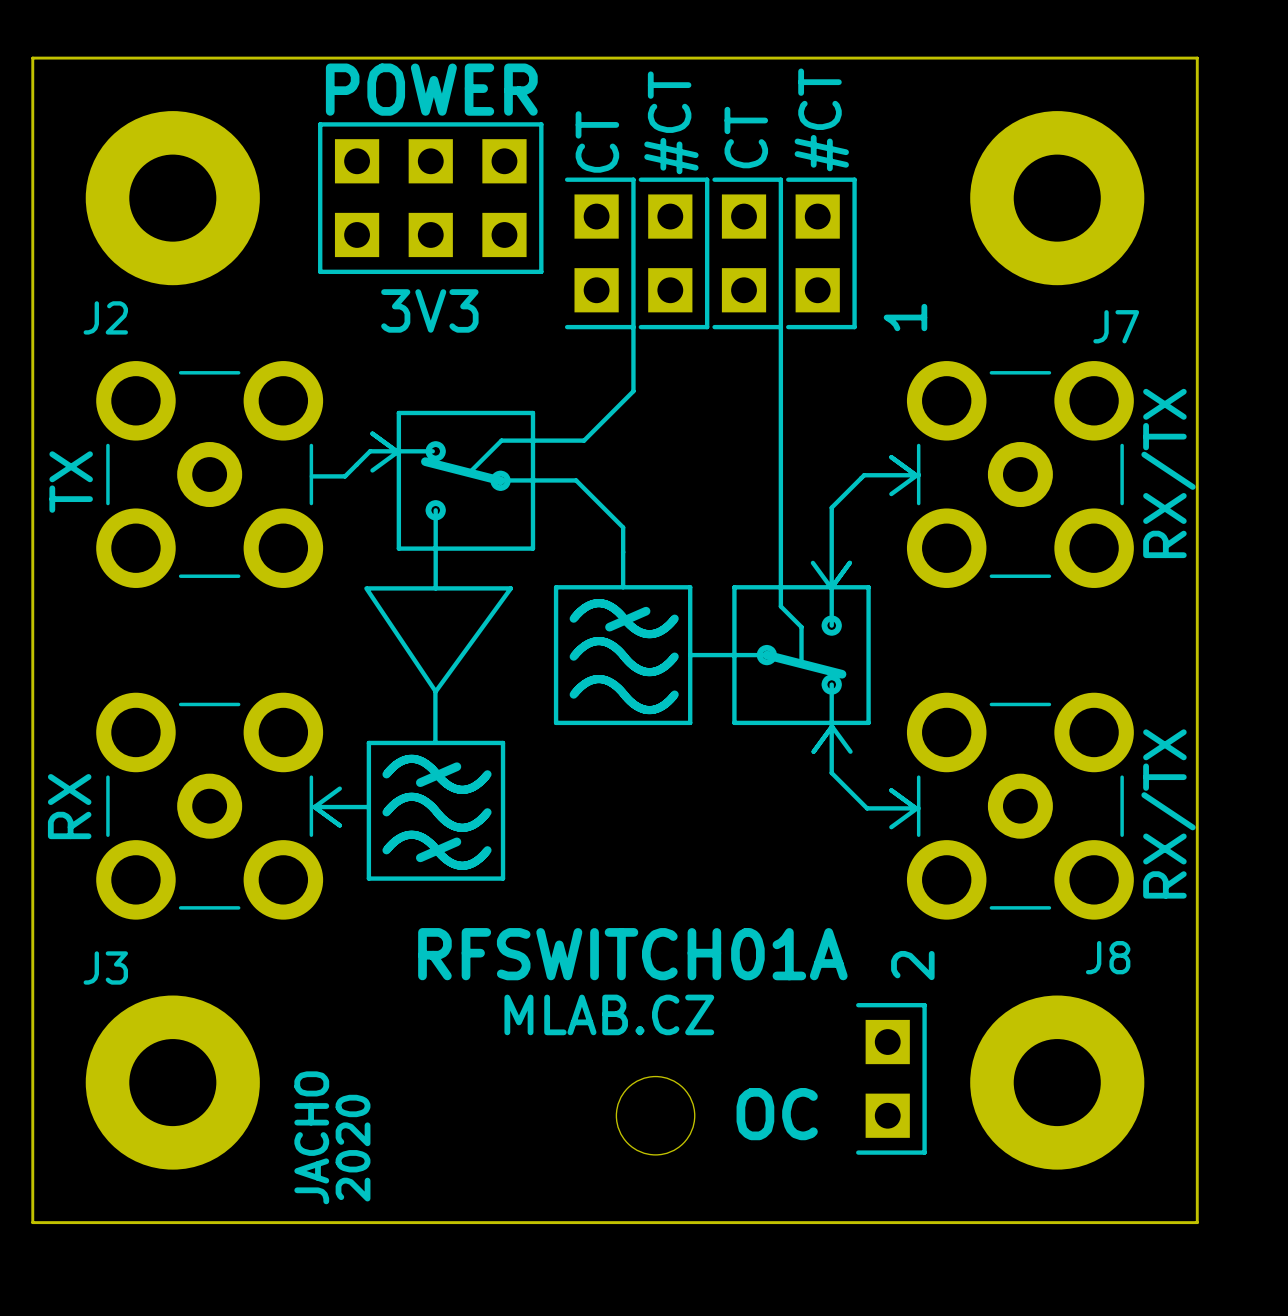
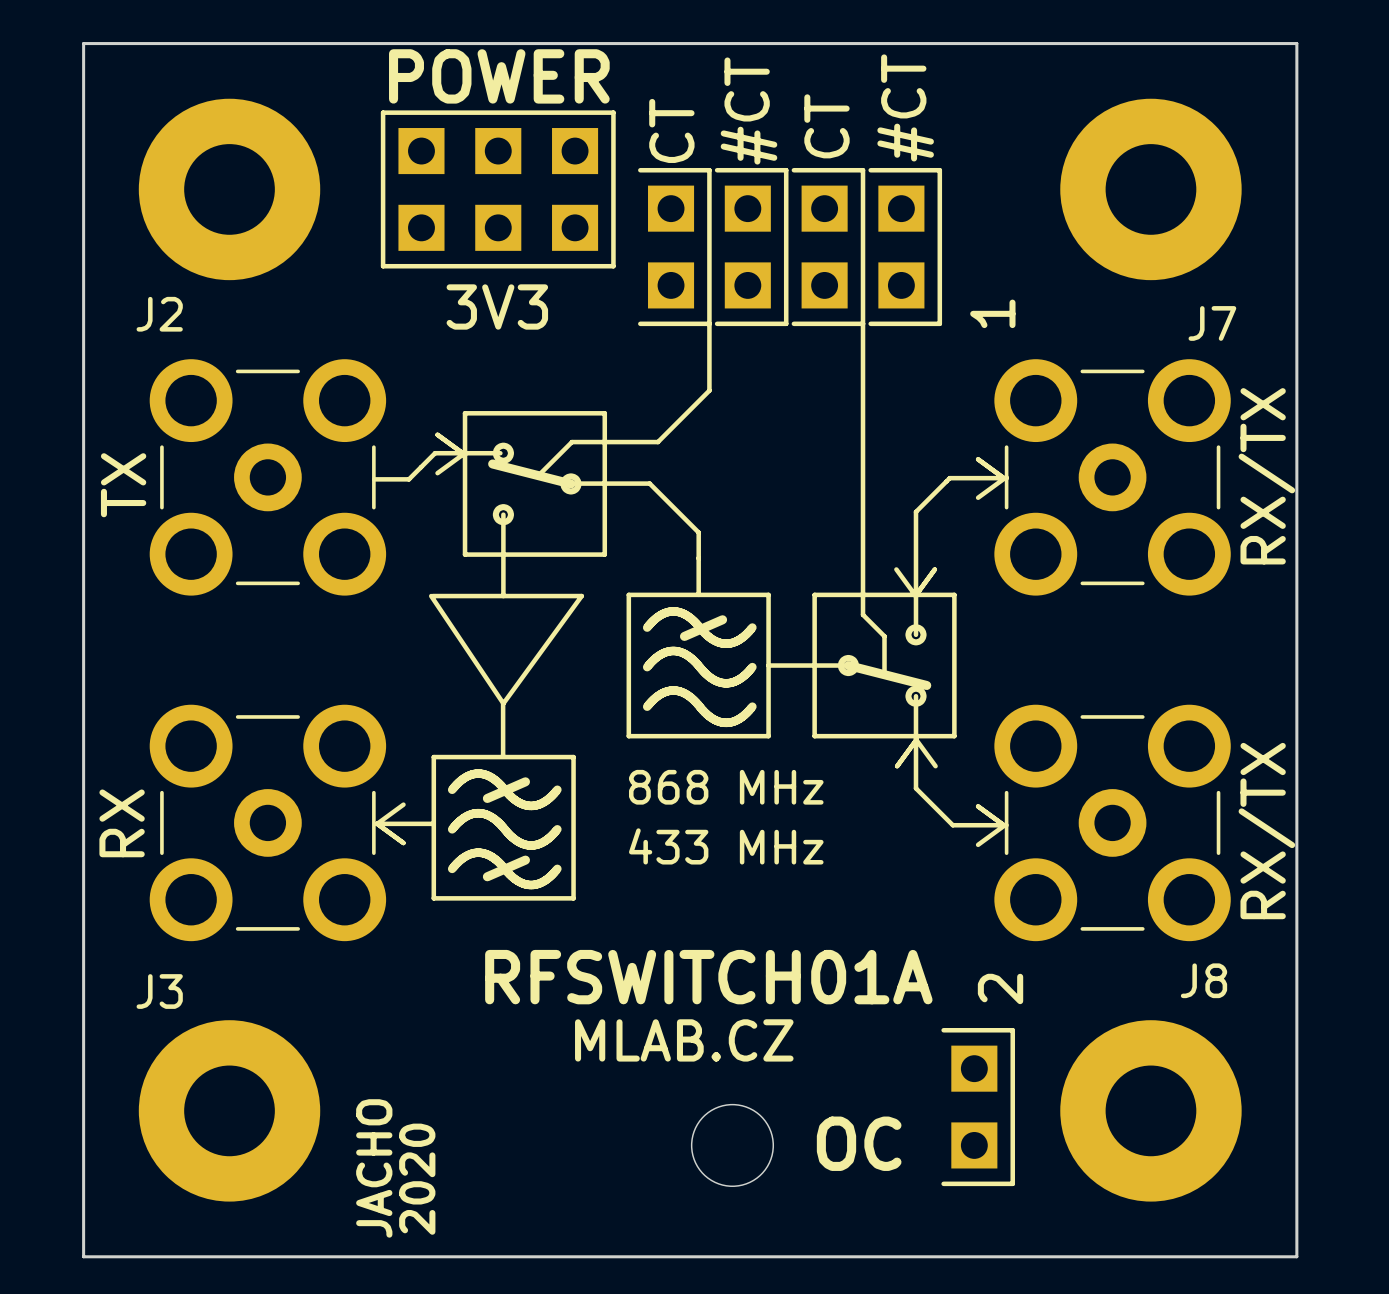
text: none -> 868 MHz (726, 787)
text: none -> 433 MHz (726, 846)

